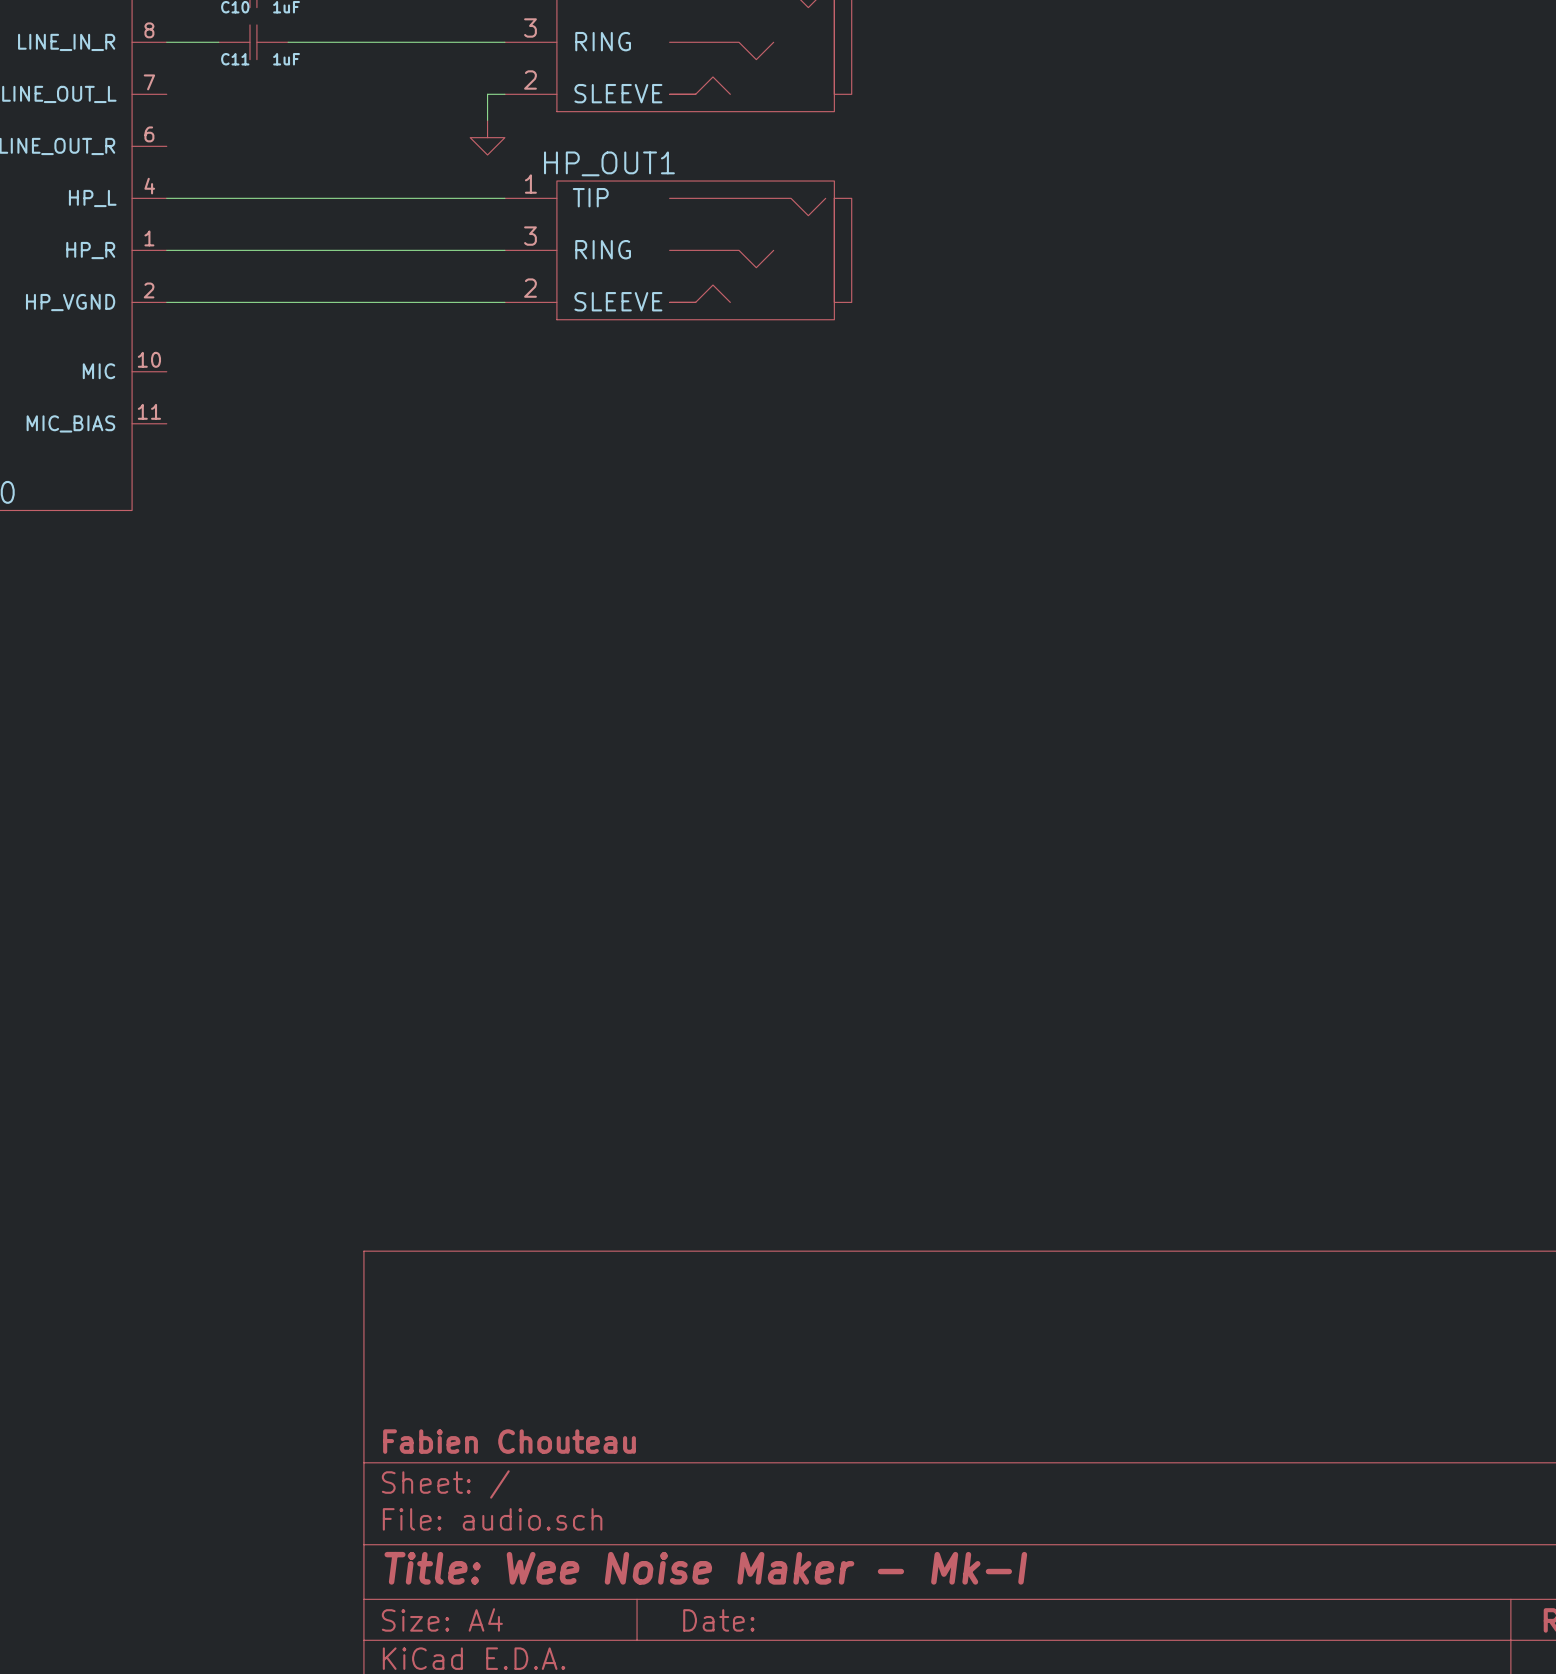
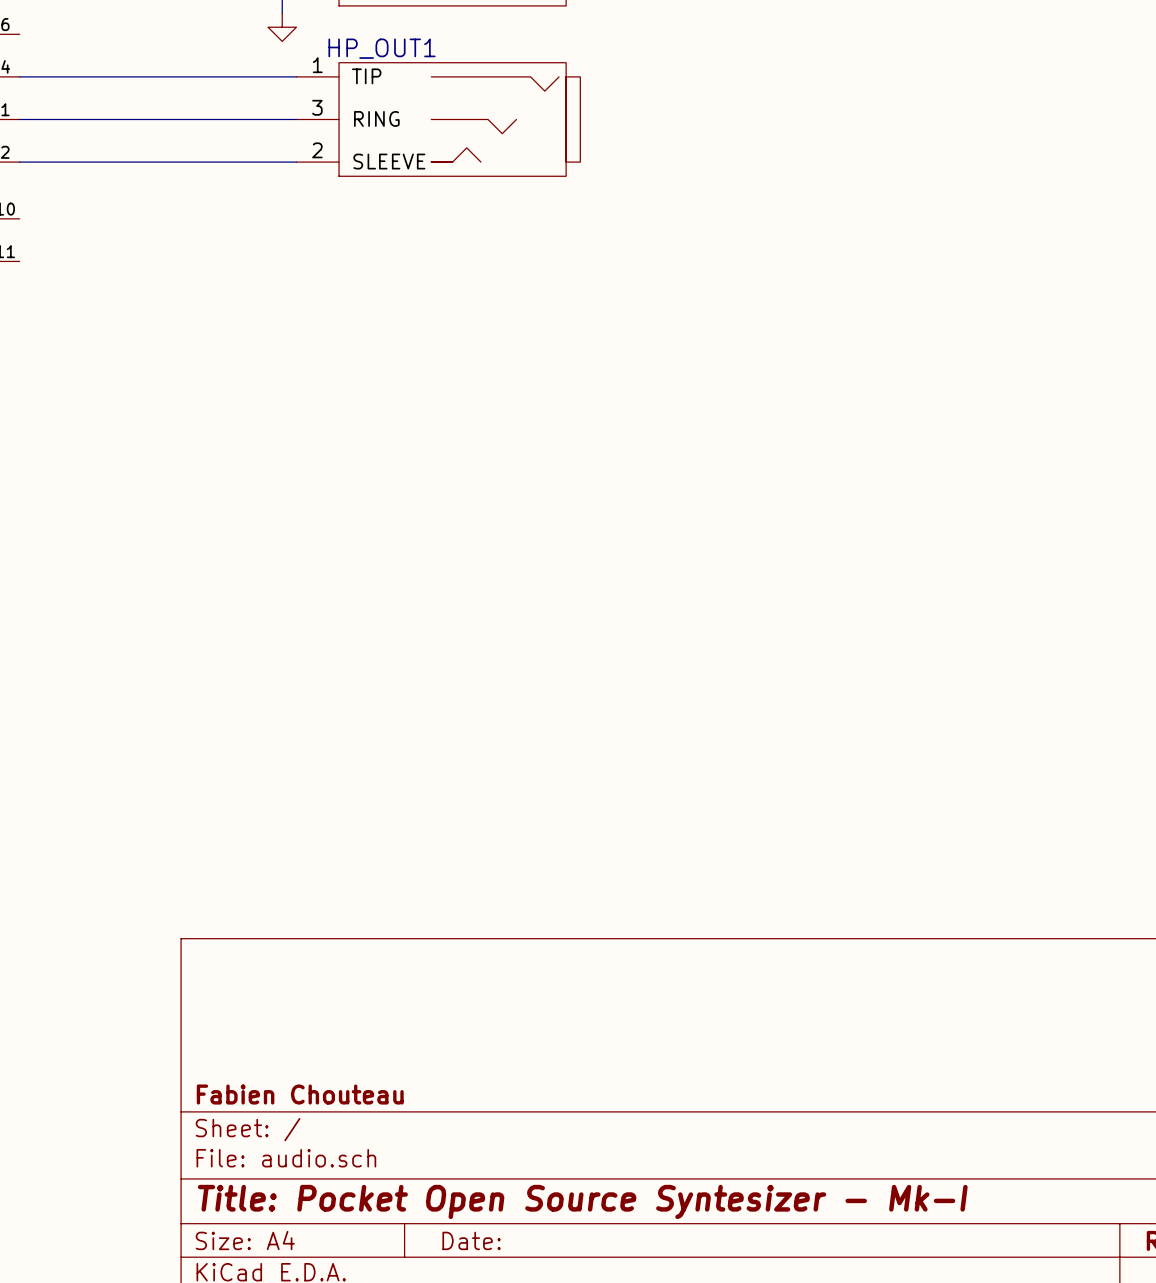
title block: Title: Wee Noise Maker - Mk-I (705, 1568) -> Title: Pocket Open Source Syntesizer - Mk-I (582, 1201)

